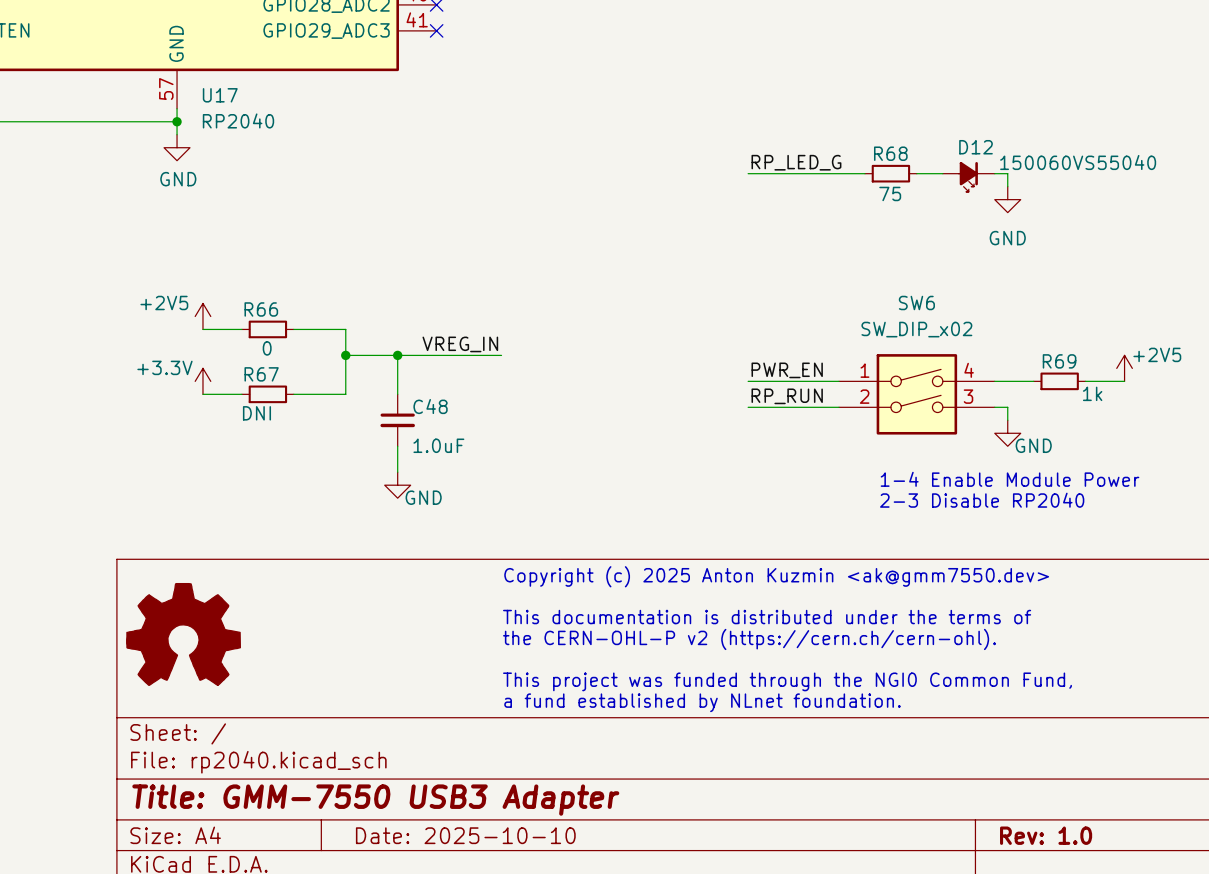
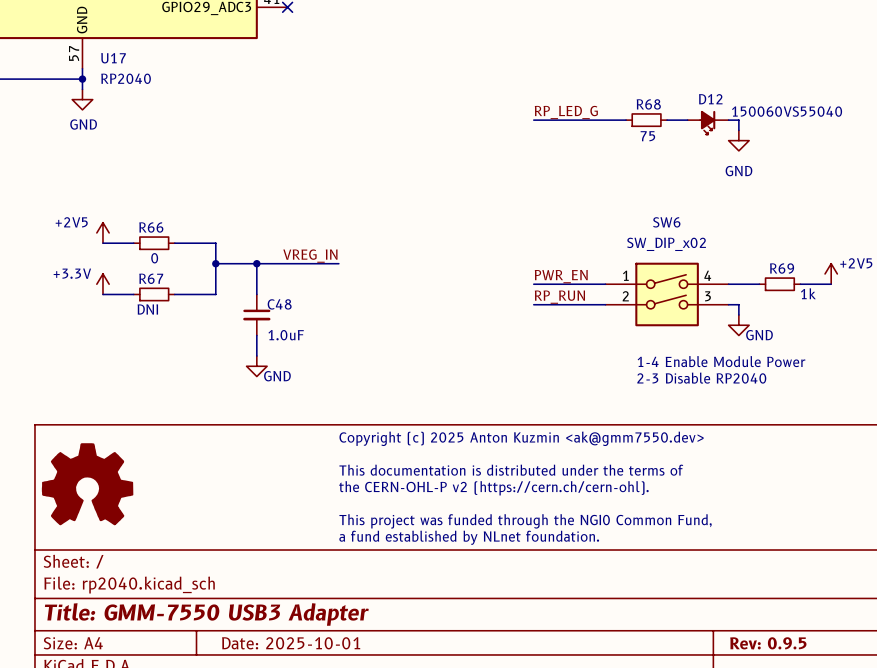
title block: Date: 2025-10-10 (465, 835) -> Date: 2025-10-01 (291, 643)
title block: Rev: 1.0 (1046, 835) -> Rev: 0.9.5 (768, 643)

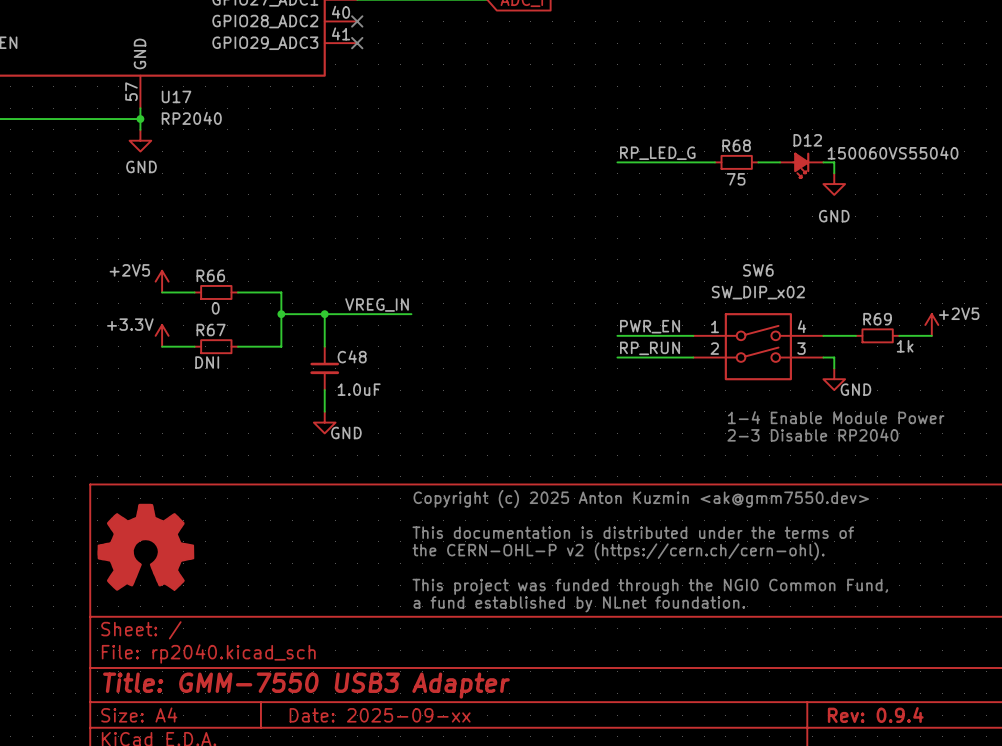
title block: Date: 2025-10-01 (291, 643) -> Date: 2025-09-xx (380, 715)
title block: Rev: 0.9.5 (768, 643) -> Rev: 0.9.4 (875, 715)

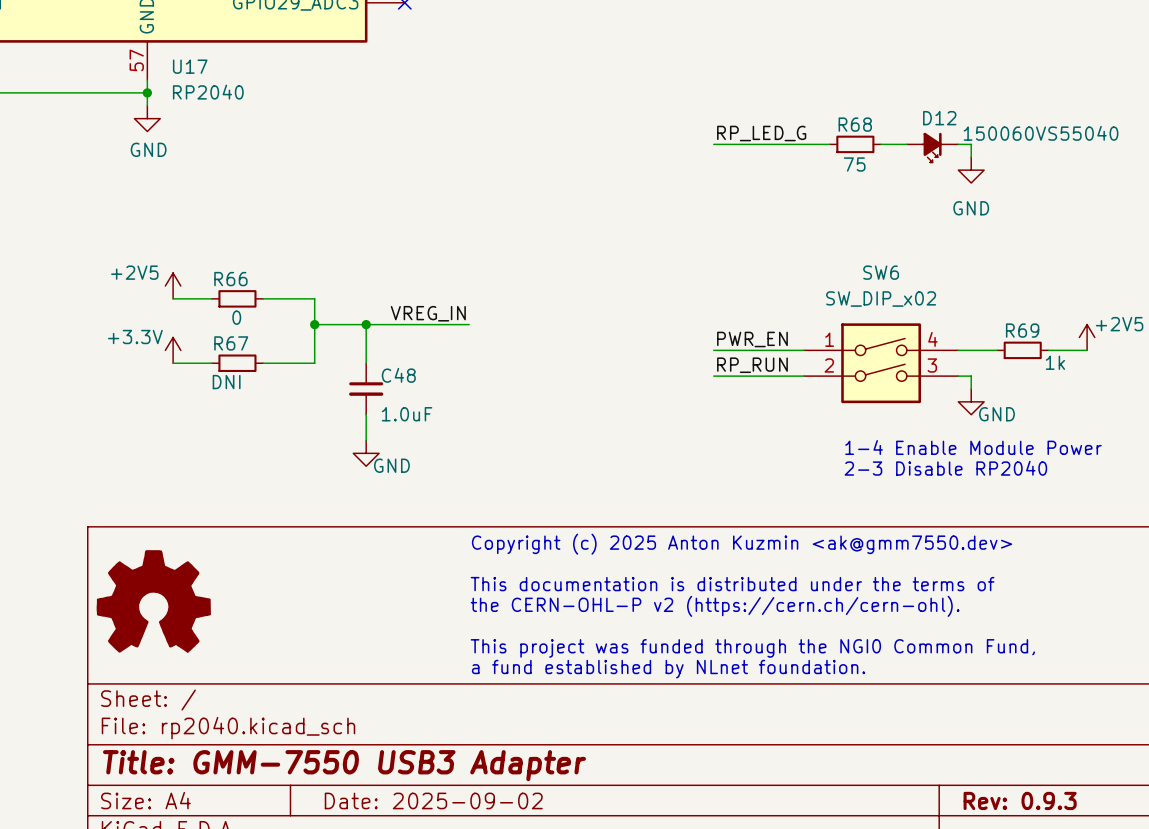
title block: Date: 2025-09-xx (380, 715) -> Date: 2025-09-02 (433, 800)
title block: Rev: 0.9.4 (875, 715) -> Rev: 0.9.3 (1020, 800)

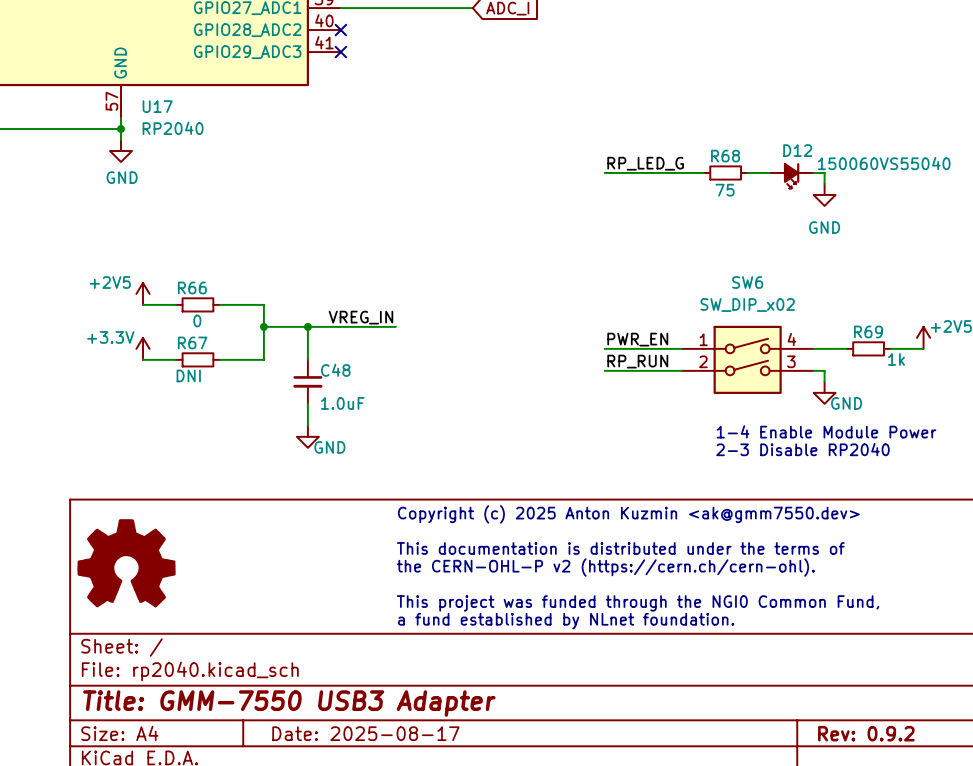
title block: Date: 2025-09-02 (433, 800) -> Date: 2025-08-17 (365, 733)
title block: Rev: 0.9.3 (1020, 800) -> Rev: 0.9.2 (866, 733)

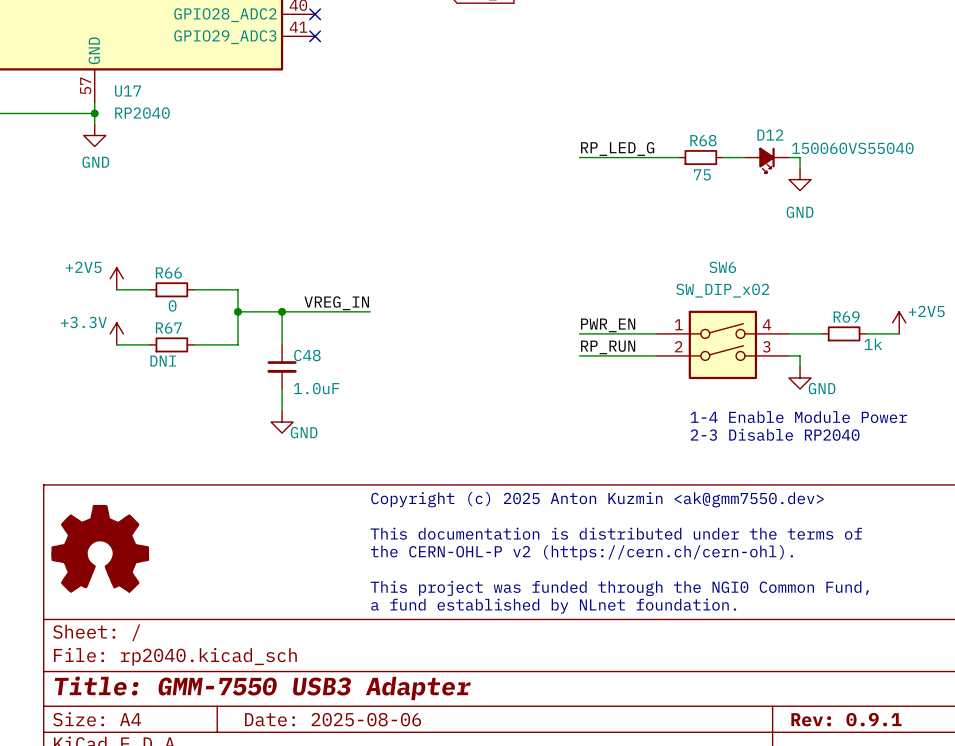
title block: Date: 2025-08-17 (365, 733) -> Date: 2025-08-06 (333, 719)
title block: Rev: 0.9.2 (866, 733) -> Rev: 0.9.1 (846, 719)

